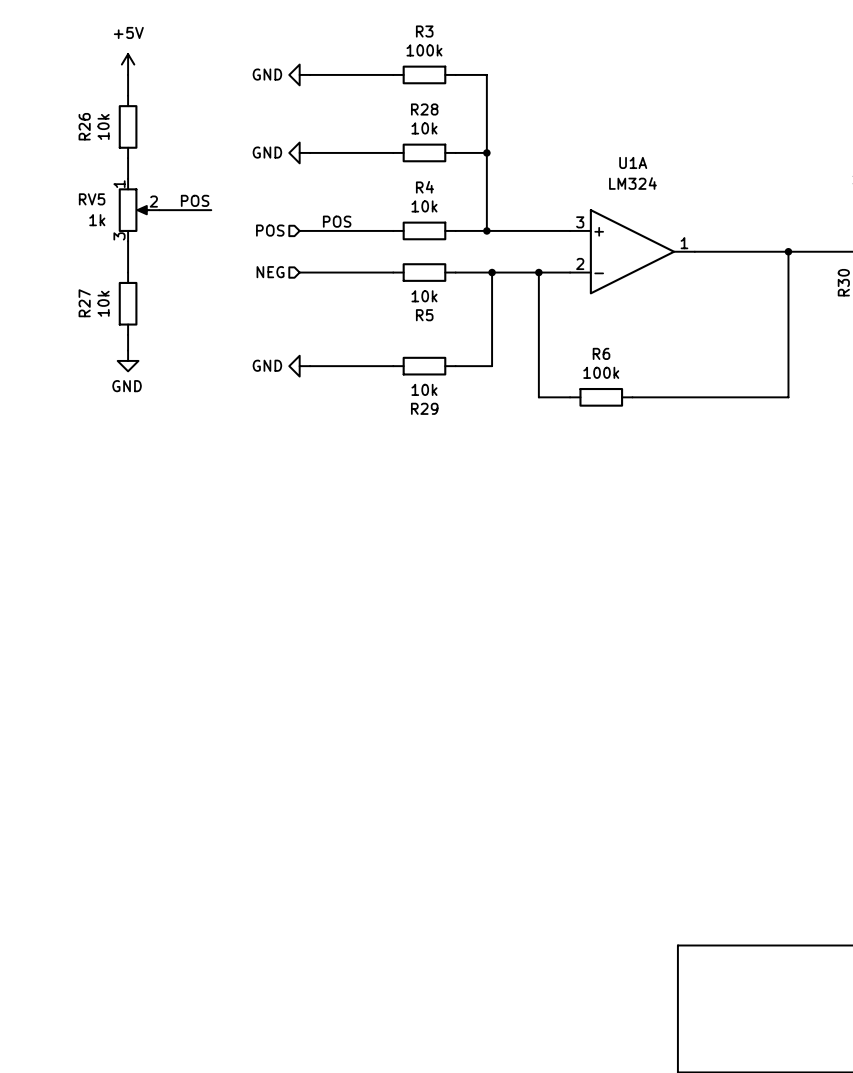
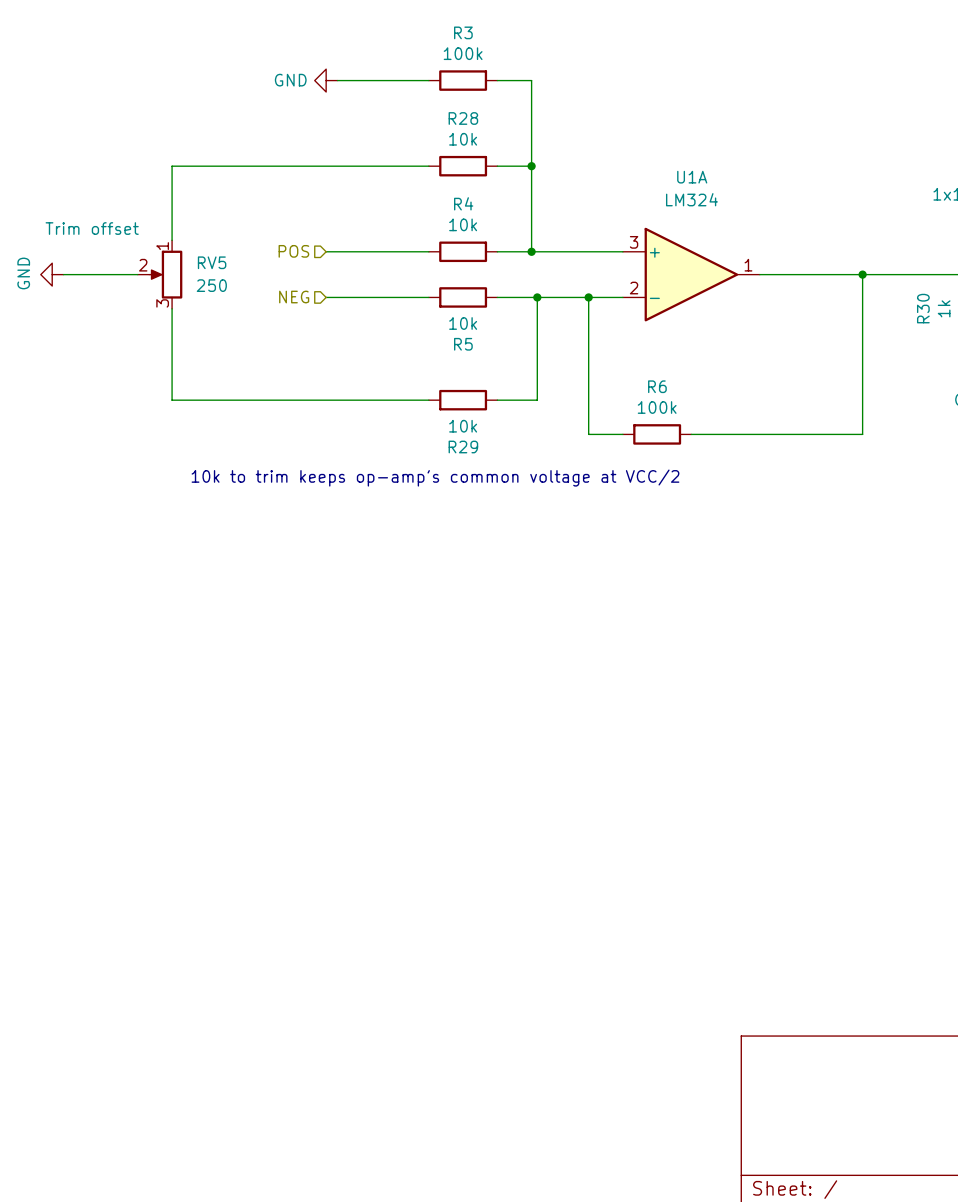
power symbol: +5V (128, 64) -> none
wire: (128, 74) (128, 95) -> none
R26: 10k (128, 126) -> none
power symbol: GND (299, 152) -> none
wire: none -> (337, 166) (172, 166) (172, 240)
wire: (128, 158) (128, 178) -> none
label: POS (195, 200) -> none
RV5 text: none -> Trim offset (92, 228)
RV5 flip: as is (133, 210) -> left-right (165, 274)
RV5 position: (139, 210) -> (160, 274)
wire: (159, 210) (211, 210) -> none
RV5 value: 1k (97, 220) -> 250 (211, 285)
label: POS (337, 221) -> none
wire: (128, 241) (128, 272) -> none
power symbol: none -> GND (52, 274)
wire: none -> (63, 274) (137, 274)
wire: none -> (172, 308) (172, 400) (337, 400)
R27: 10k (128, 303) -> none
wire: (128, 334) (128, 350) -> none
power symbol: GND (128, 360) -> none
power symbol: GND (299, 366) -> none
text: none -> 10k to trim keeps op-amp's common voltage at VCC/2 (435, 478)

